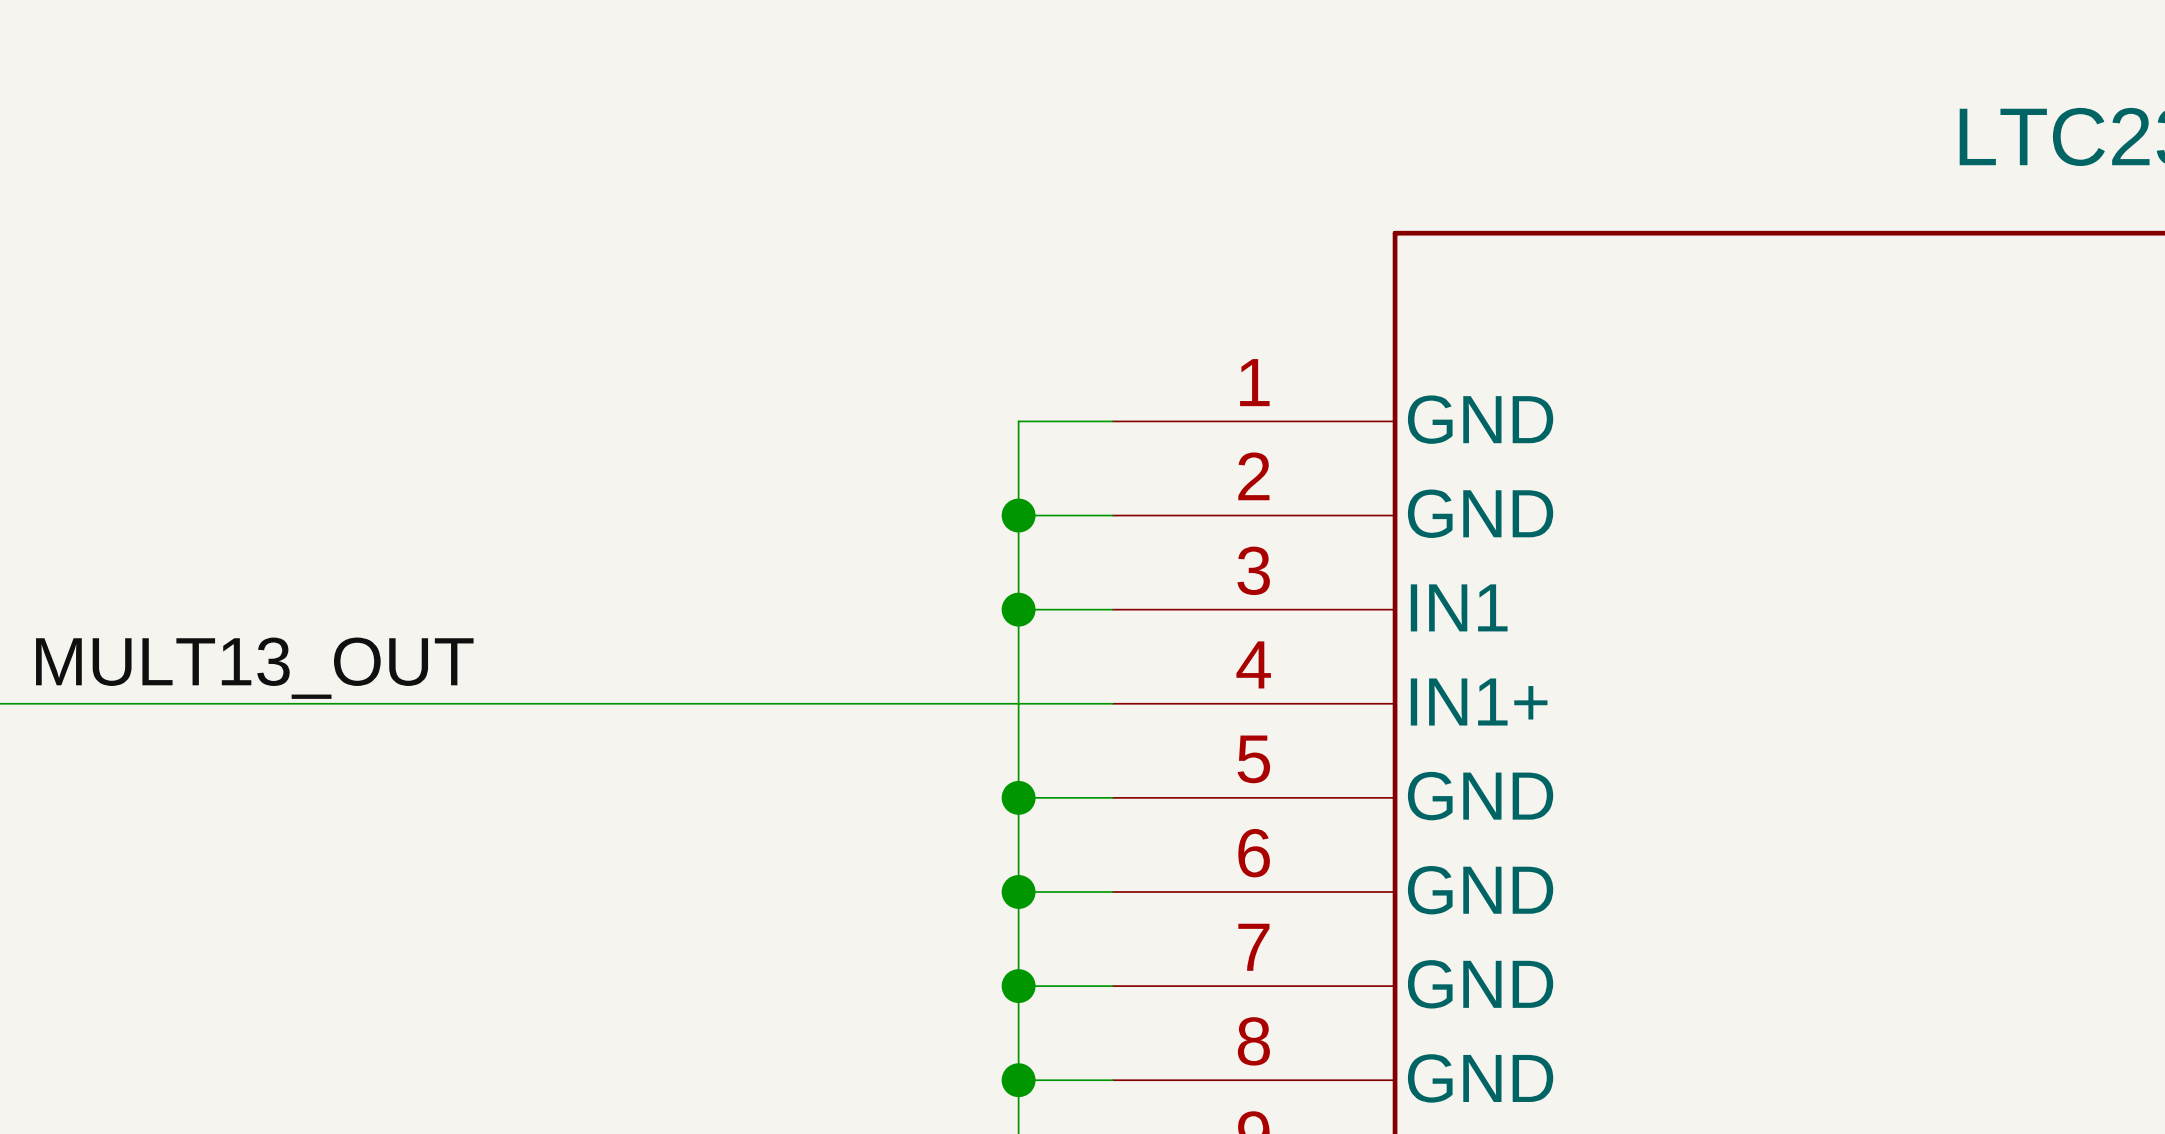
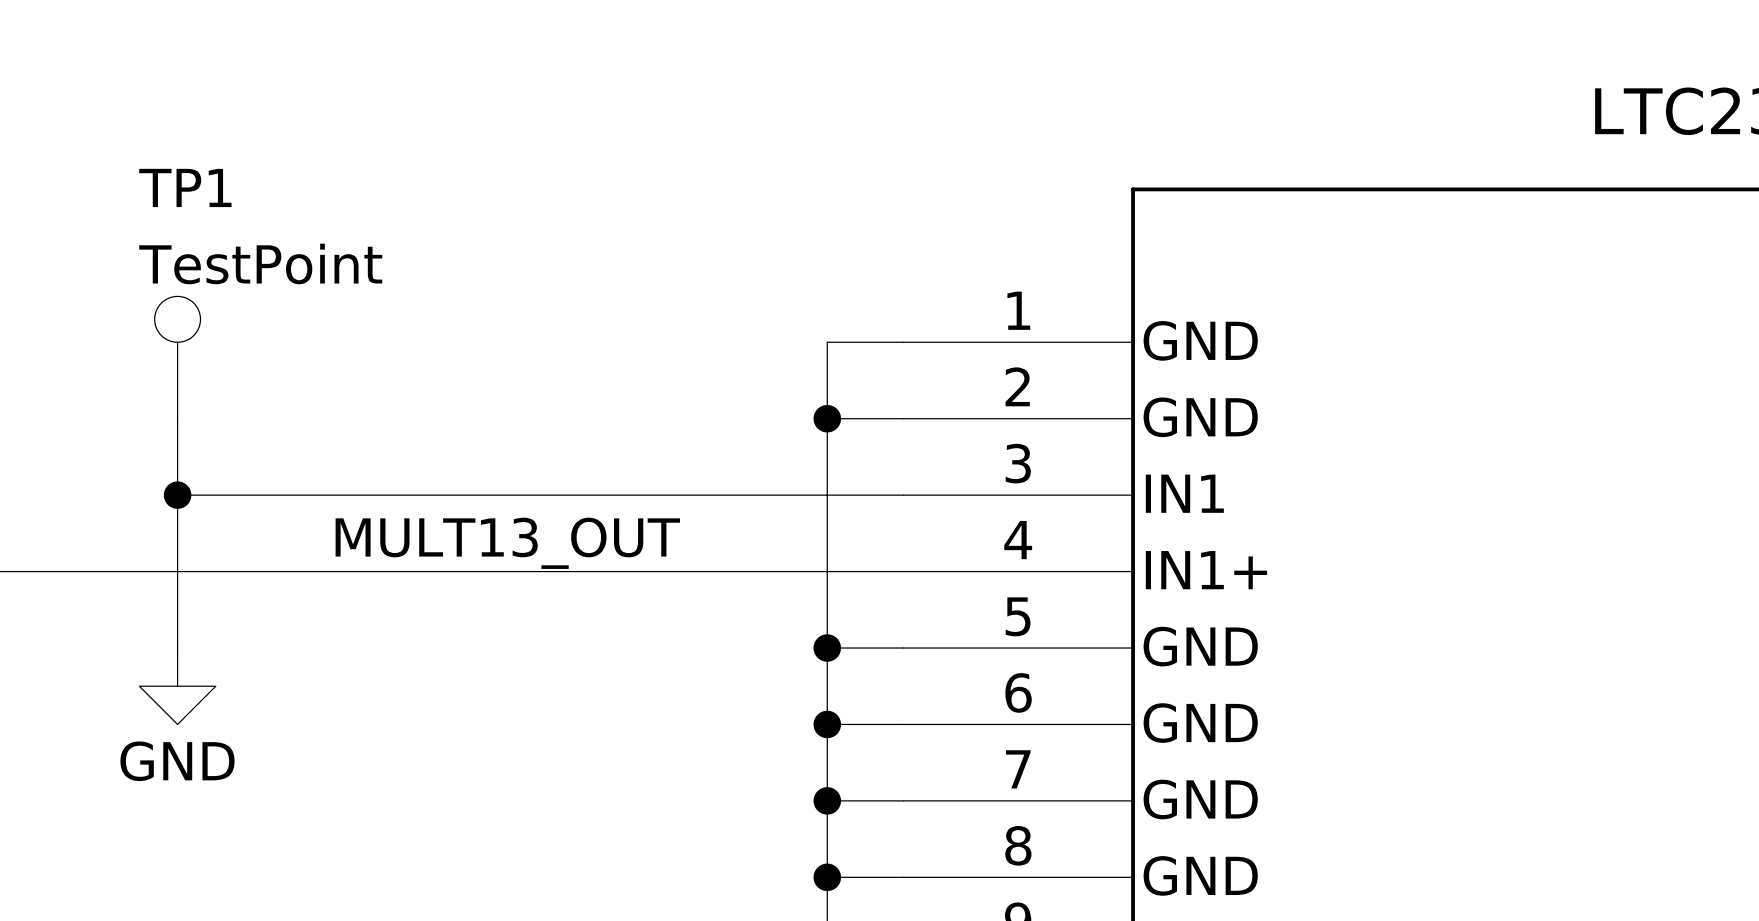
TP1: none -> TestPoint (177, 357)
wire: none -> (177, 418) (177, 648)
wire: none -> (177, 495) (827, 495)
junction: none -> (177, 495)
junction: (1018, 609) -> none
label position: MULT13_OUT (254, 668) -> MULT13_OUT (507, 543)
power symbol: none -> GND (177, 686)

